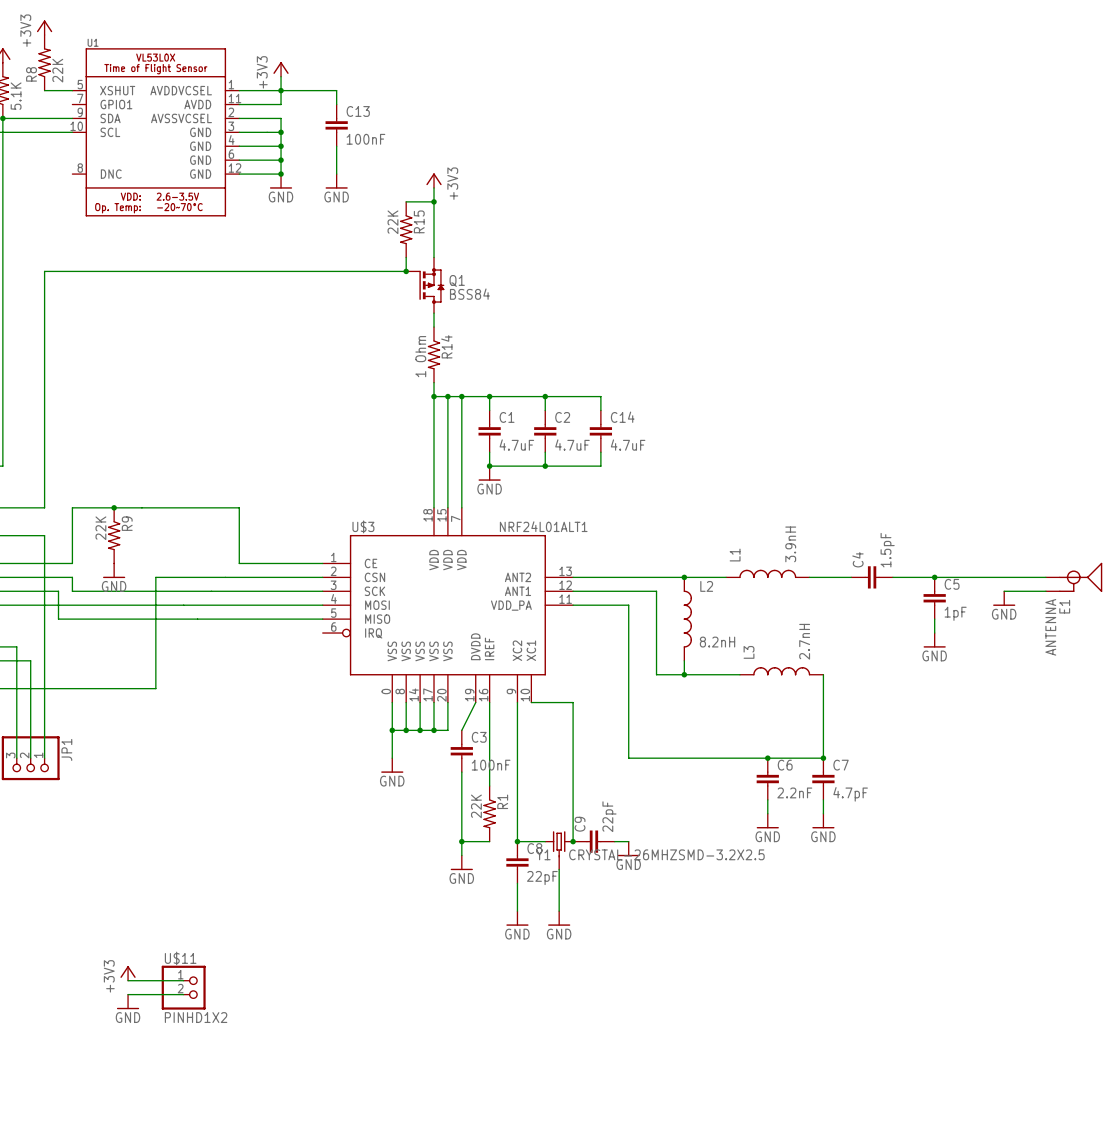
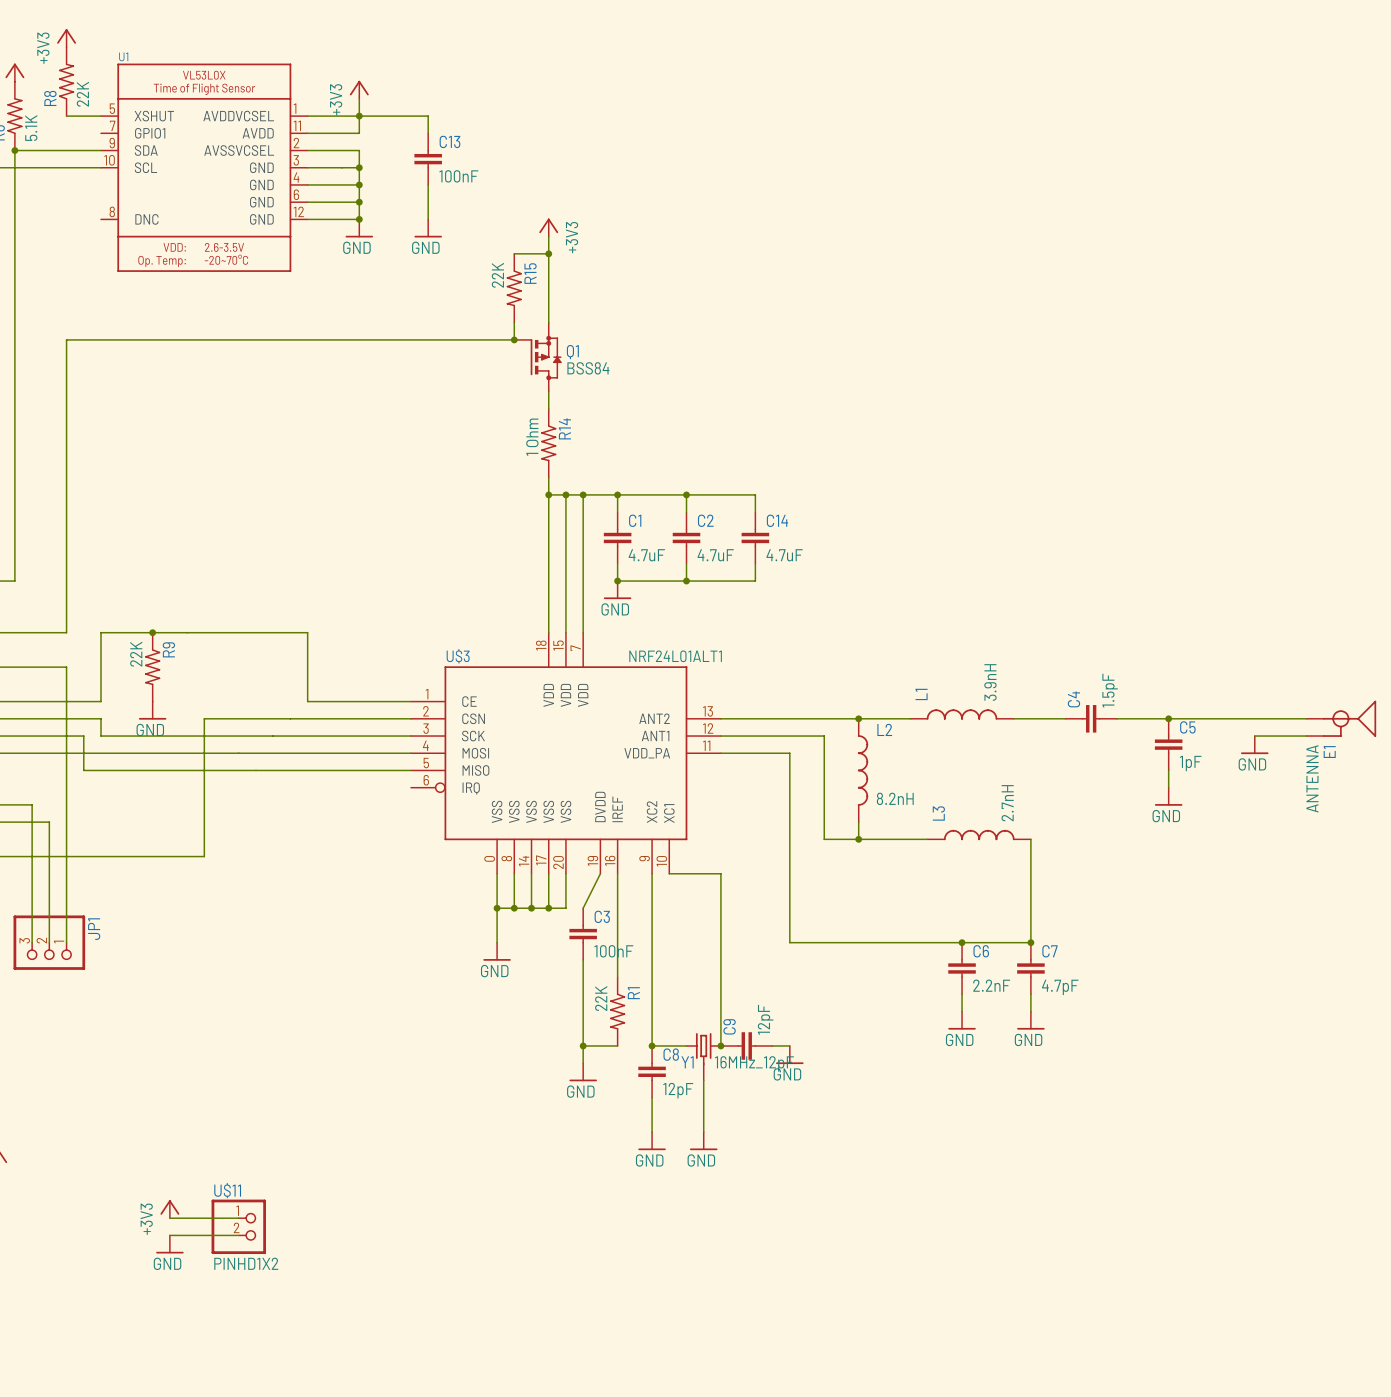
C9 value: 22pF (609, 816) -> 12pF (765, 1019)
Y1 value: CRYSTAL-26MHZSMD-3.2X2.5 (666, 854) -> 16MHz_12pF (754, 1063)
C8 value: 22pF (542, 878) -> 12pF (678, 1090)

